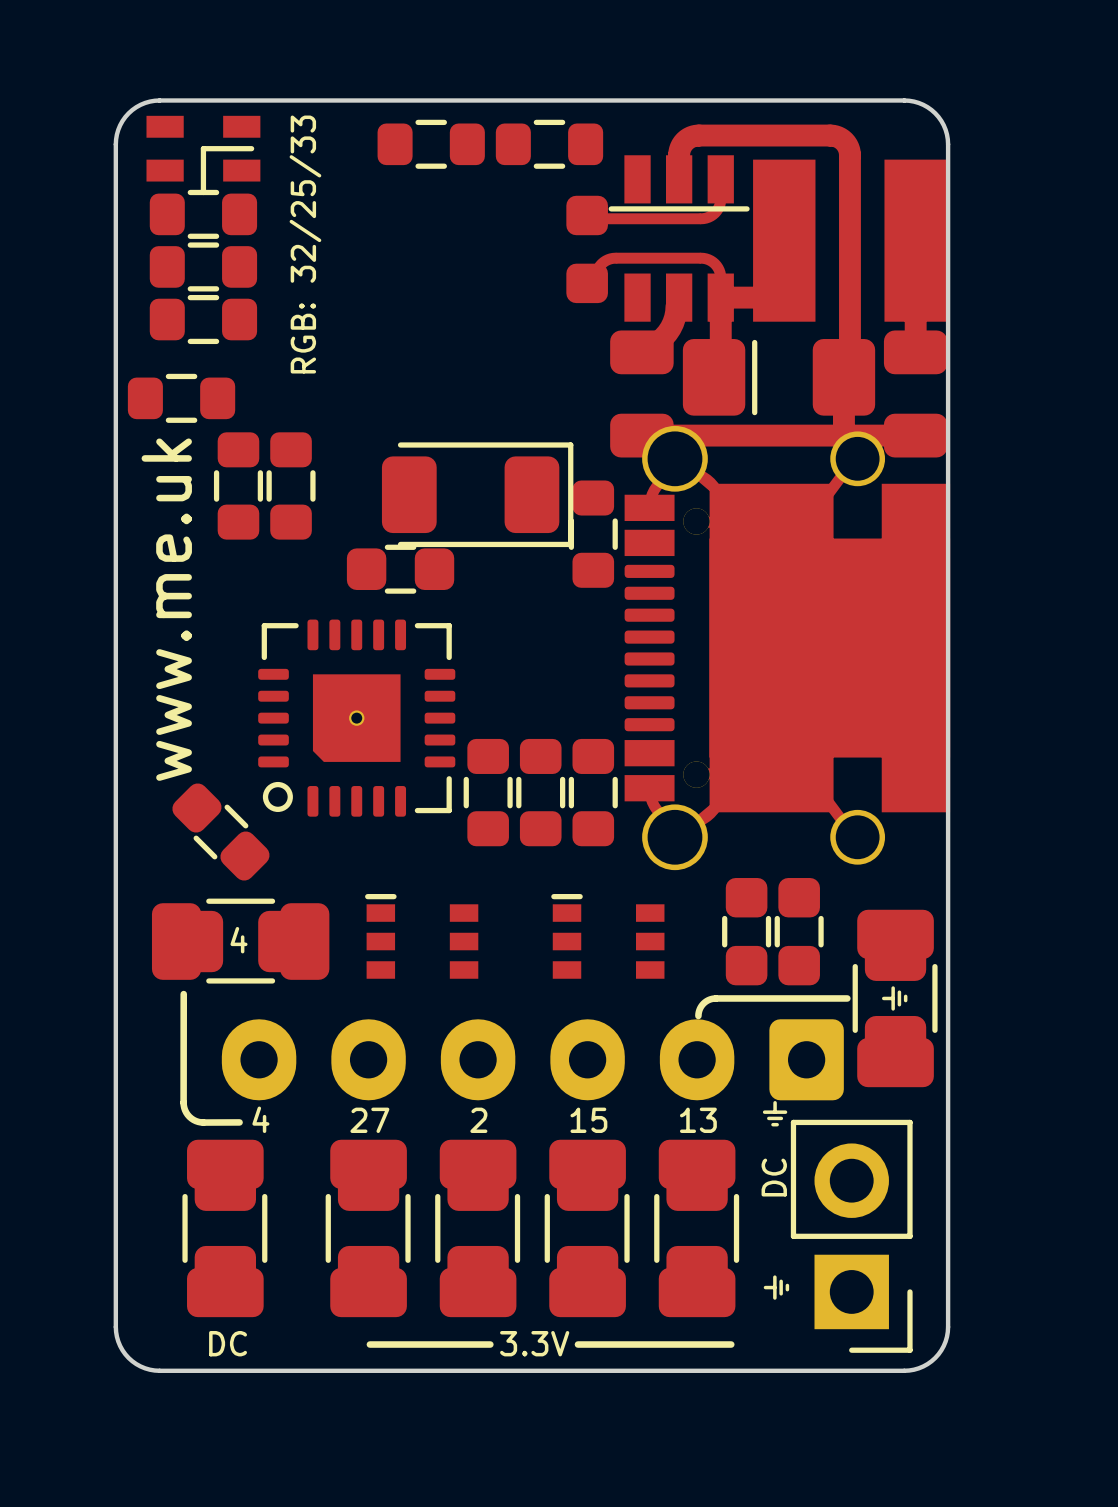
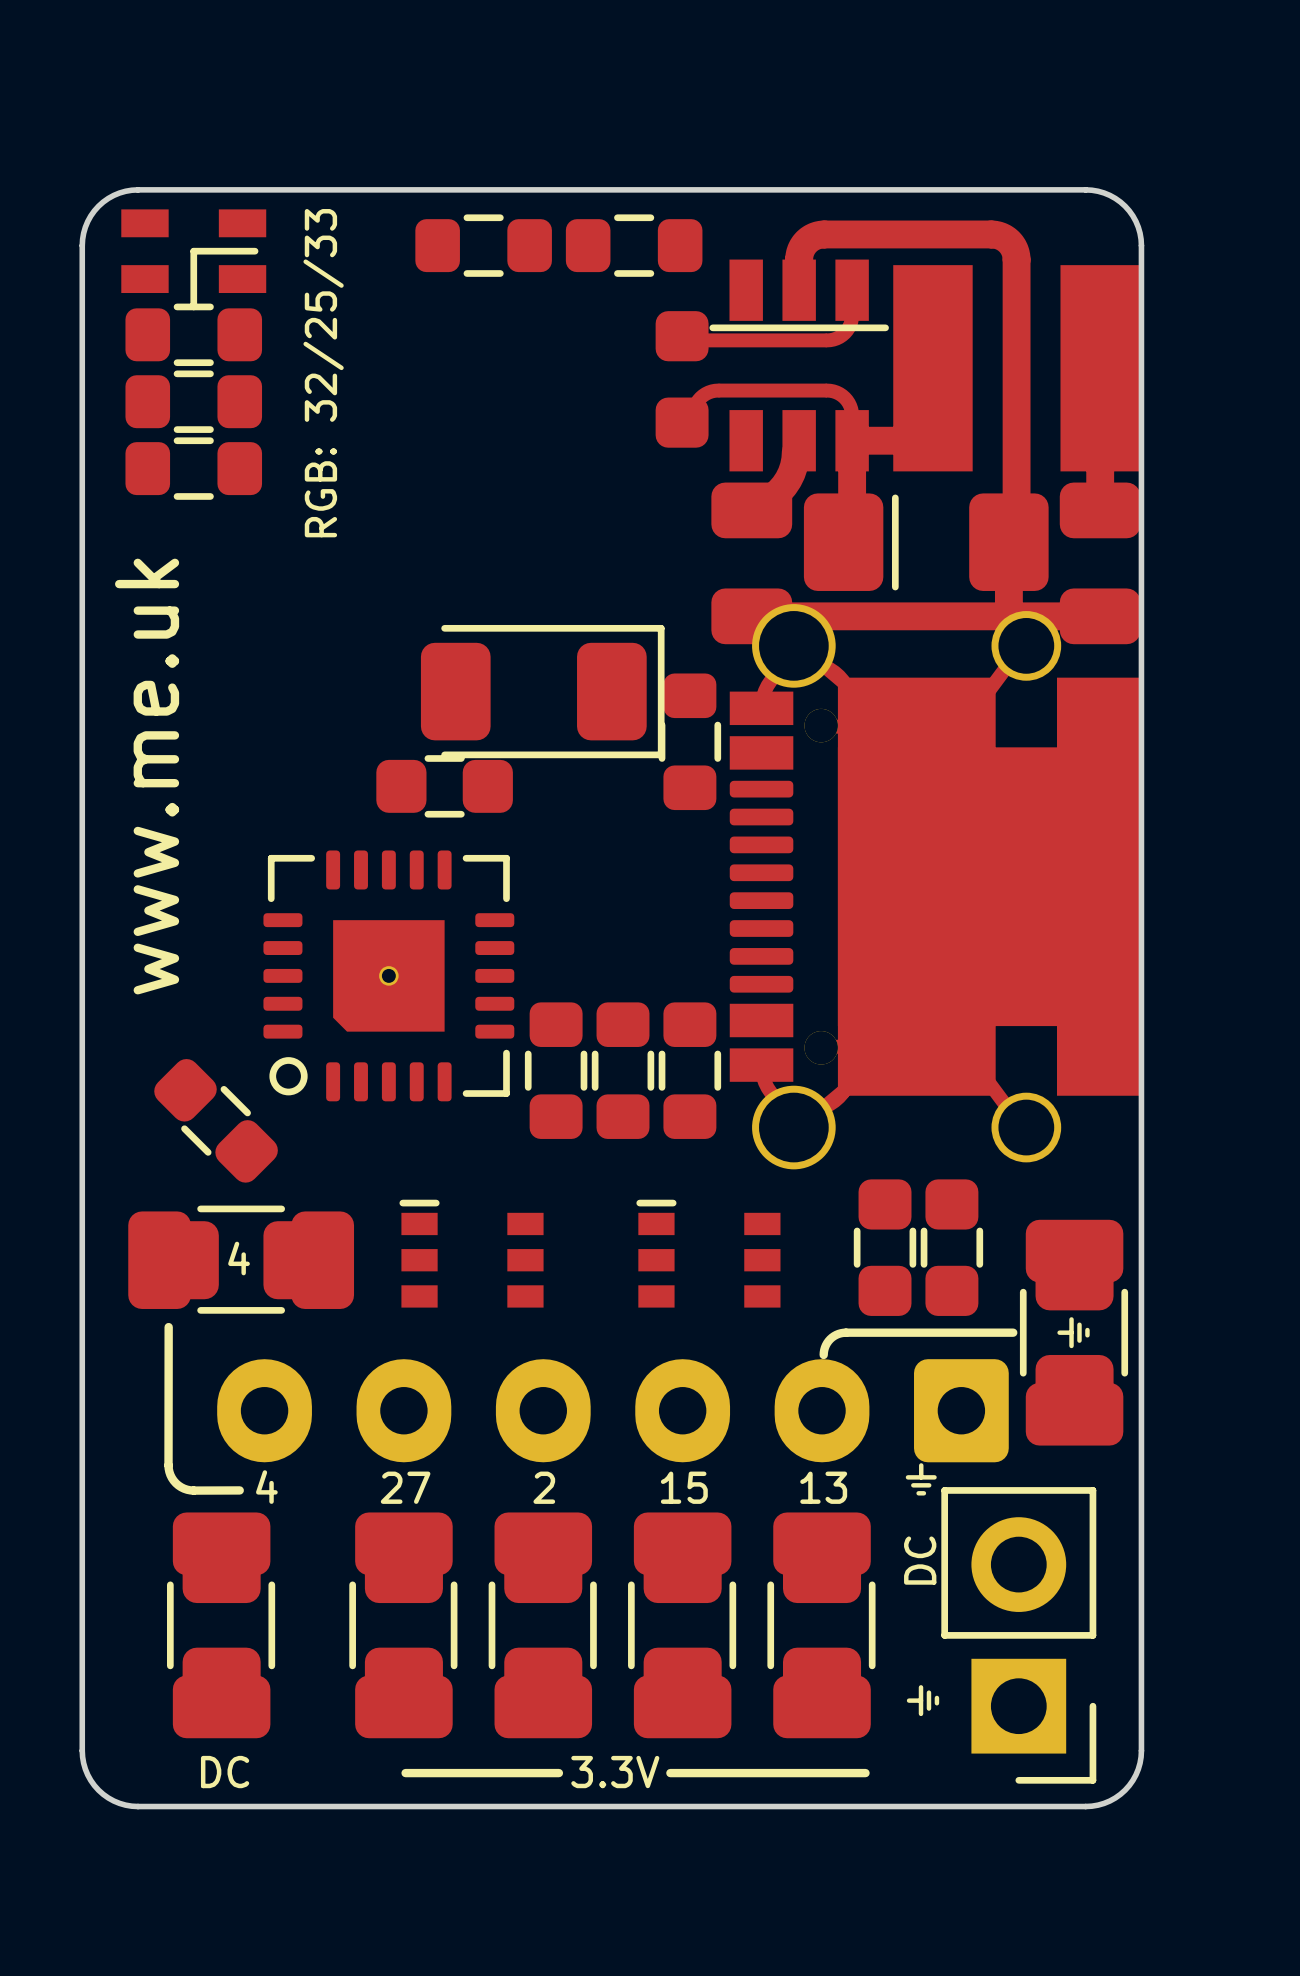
part: (181, 398) -> none
part: (238, 485) -> none
part: (291, 485) -> none
text position: www.me.uk (166, 609) -> www.me.uk (147, 776)

